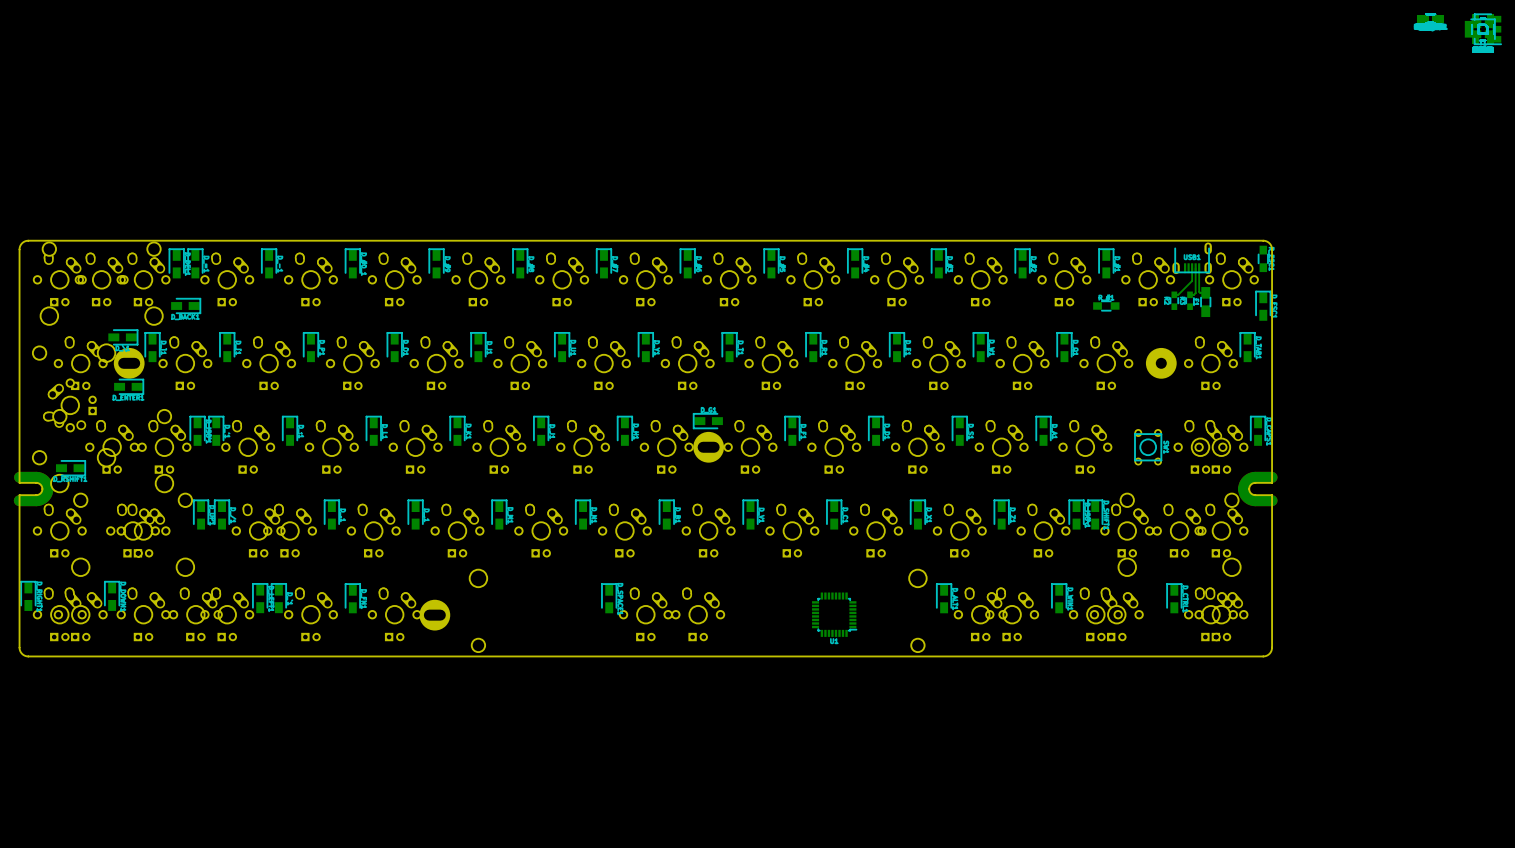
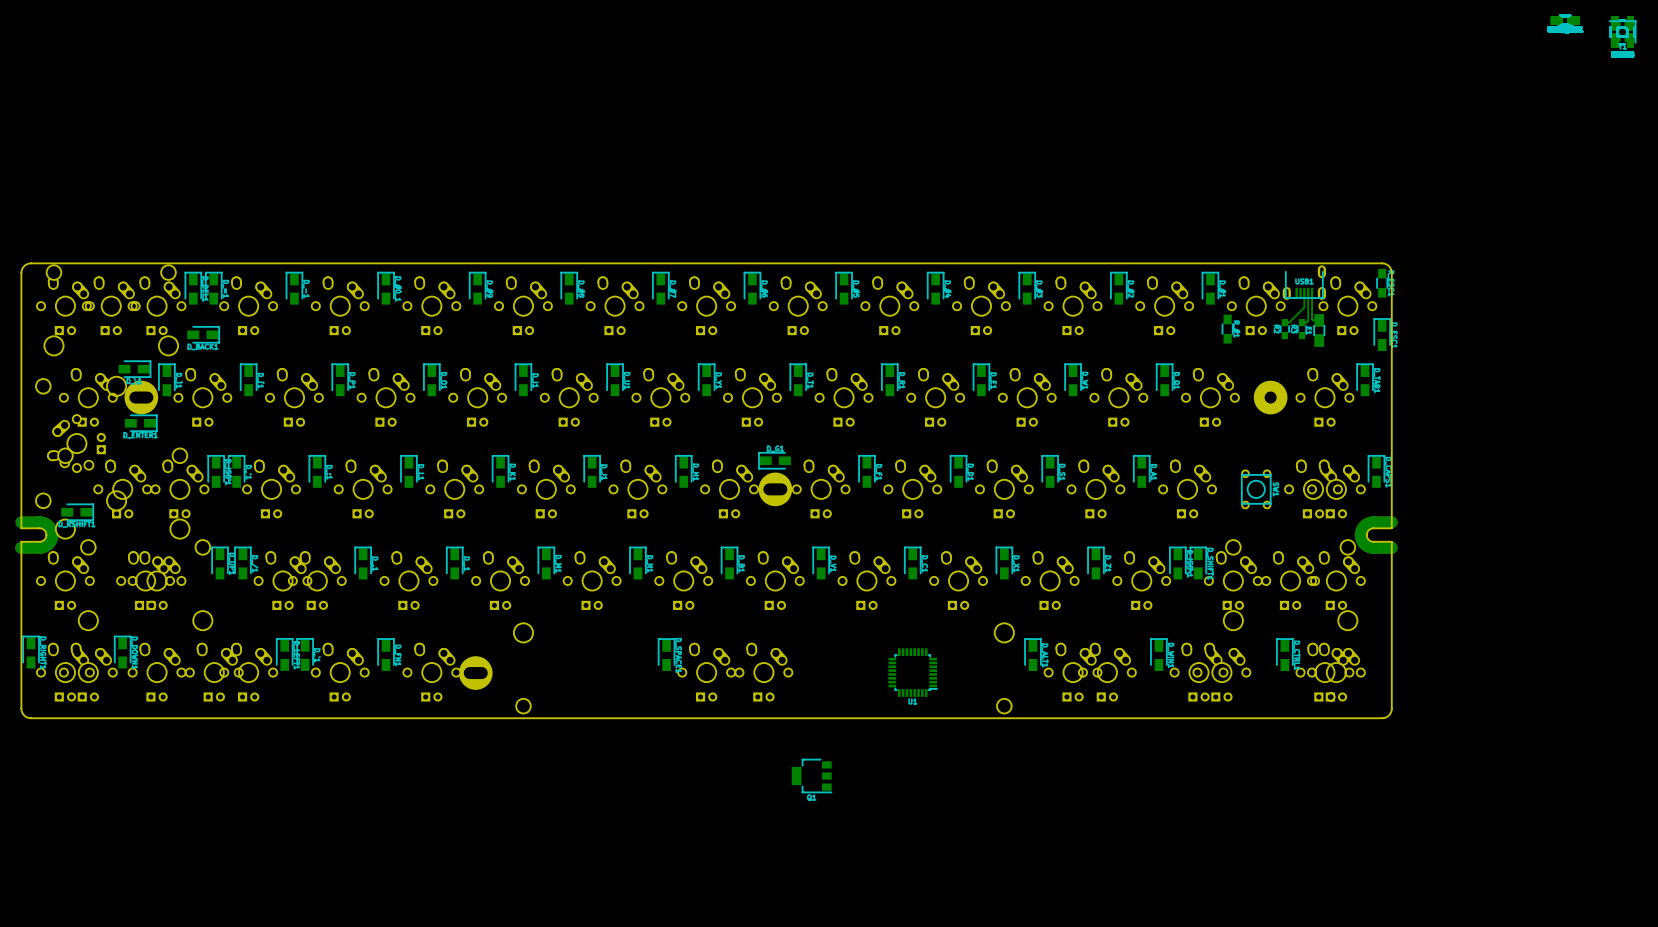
part position: (1483, 29) -> (811, 776)
part rotation: 0° (1106, 305) -> 90° clockwise (1227, 329)
part position: (1106, 305) -> (1227, 329)

